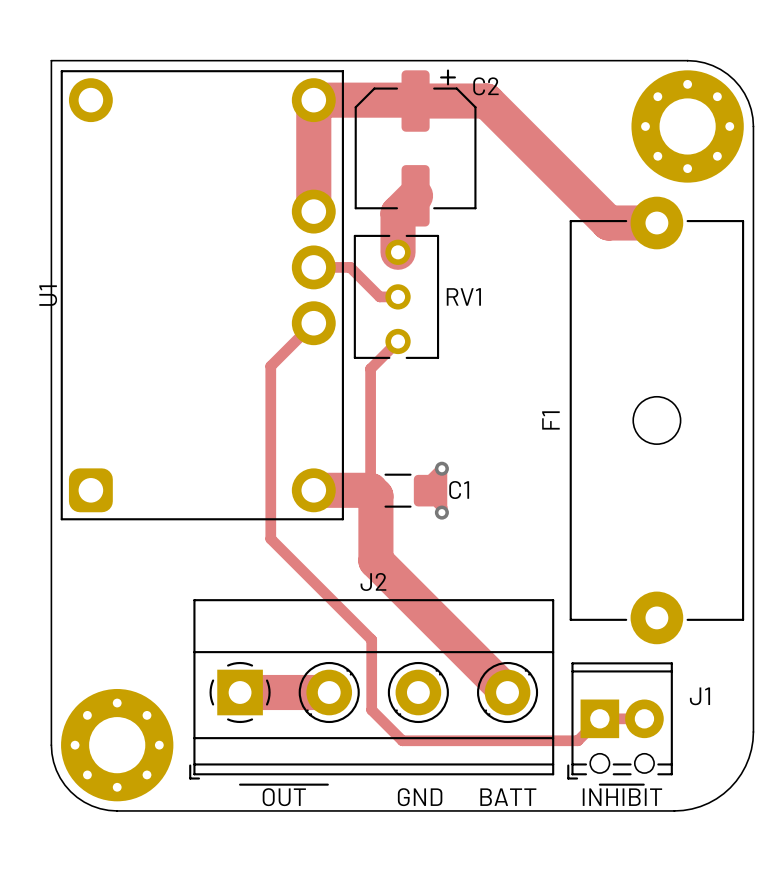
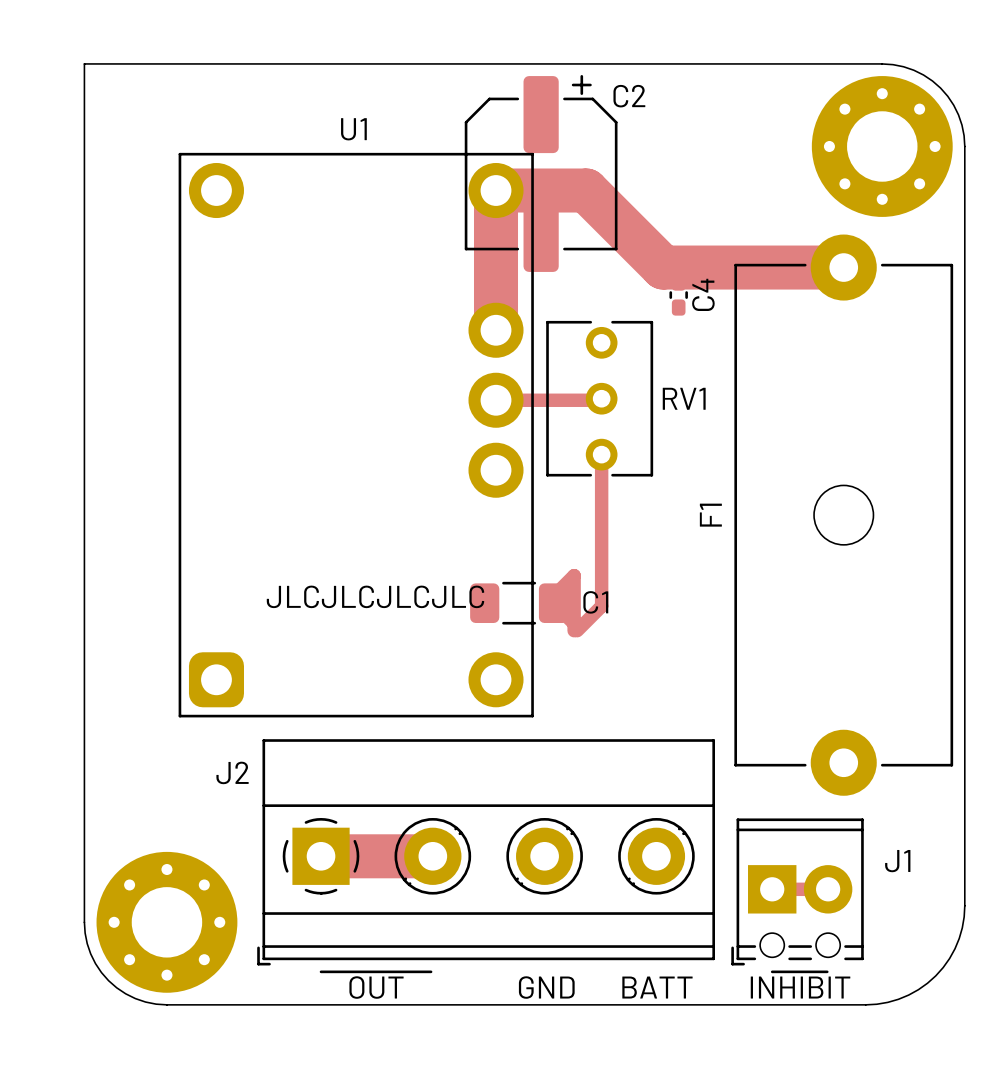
track: (415, 195) (398, 213) (398, 252) -> none
track: (313, 211) (313, 100) (486, 101) (608, 223) -> (496, 330) (496, 190) (586, 190) (663, 267) (783, 267)
C4: none -> (678, 295)
track: (313, 267) (350, 267) (379, 296) (398, 296) -> none
U1 name rotation: 0° (48, 295) -> 90° clockwise (353, 129)
U1 name position: U1 (48, 295) -> U1 (353, 129)
U1 position: (202, 295) -> (356, 435)
RV1 position: (396, 296) -> (599, 398)
track: (313, 323) (270, 366) (270, 538) (371, 639) (371, 710) (402, 740) (577, 740) (599, 718) -> none
track: none -> (601, 398) (600, 400) (496, 400)
track: (398, 341) (370, 368) (370, 490) -> none
track: none -> (601, 454) (601, 606) (577, 630)
via: (441, 468) -> none
text: none -> JLCJLCJLCJLC (375, 596)
track: (313, 490) (370, 490) (375, 495) (375, 560) (507, 692) -> none
via: (441, 512) -> none
J2 name position: J2 (373, 581) -> J2 (232, 772)

